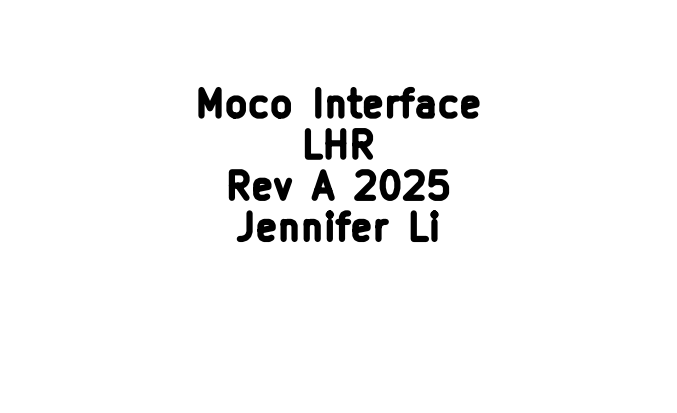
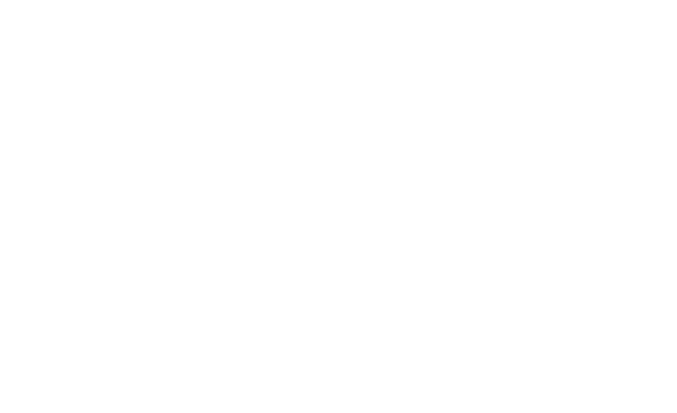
text: Moco Interface (338, 102) -> none
text: LHR (338, 143) -> none
text: Rev A 2025 (338, 185) -> none
text: Jennifer Li (337, 226) -> none

